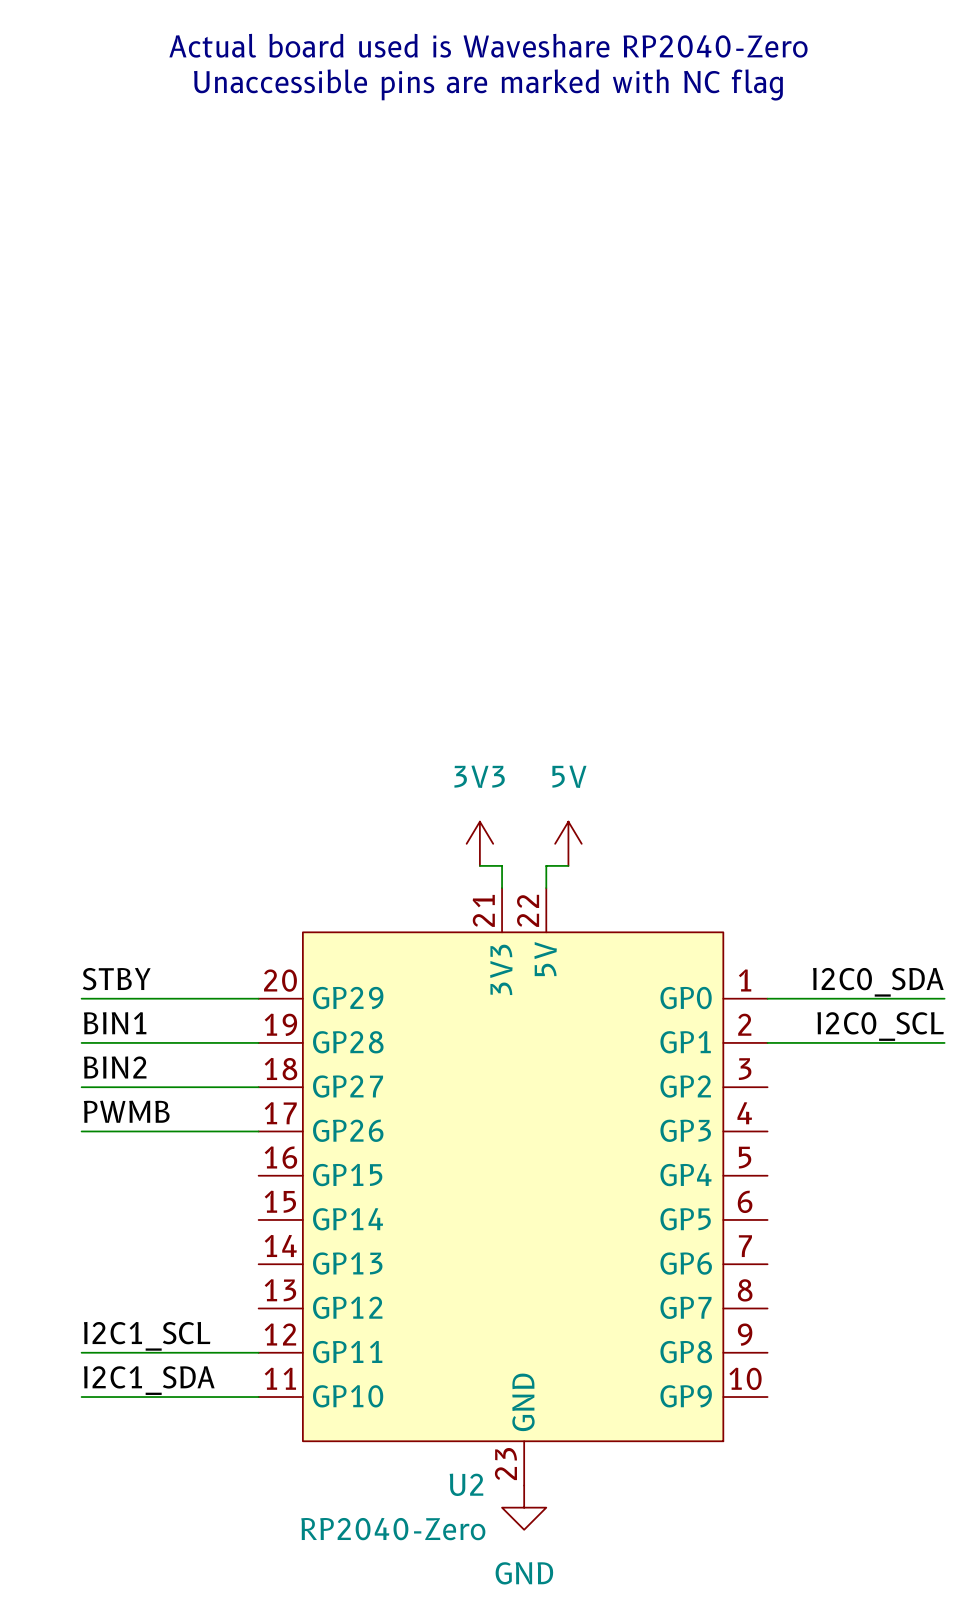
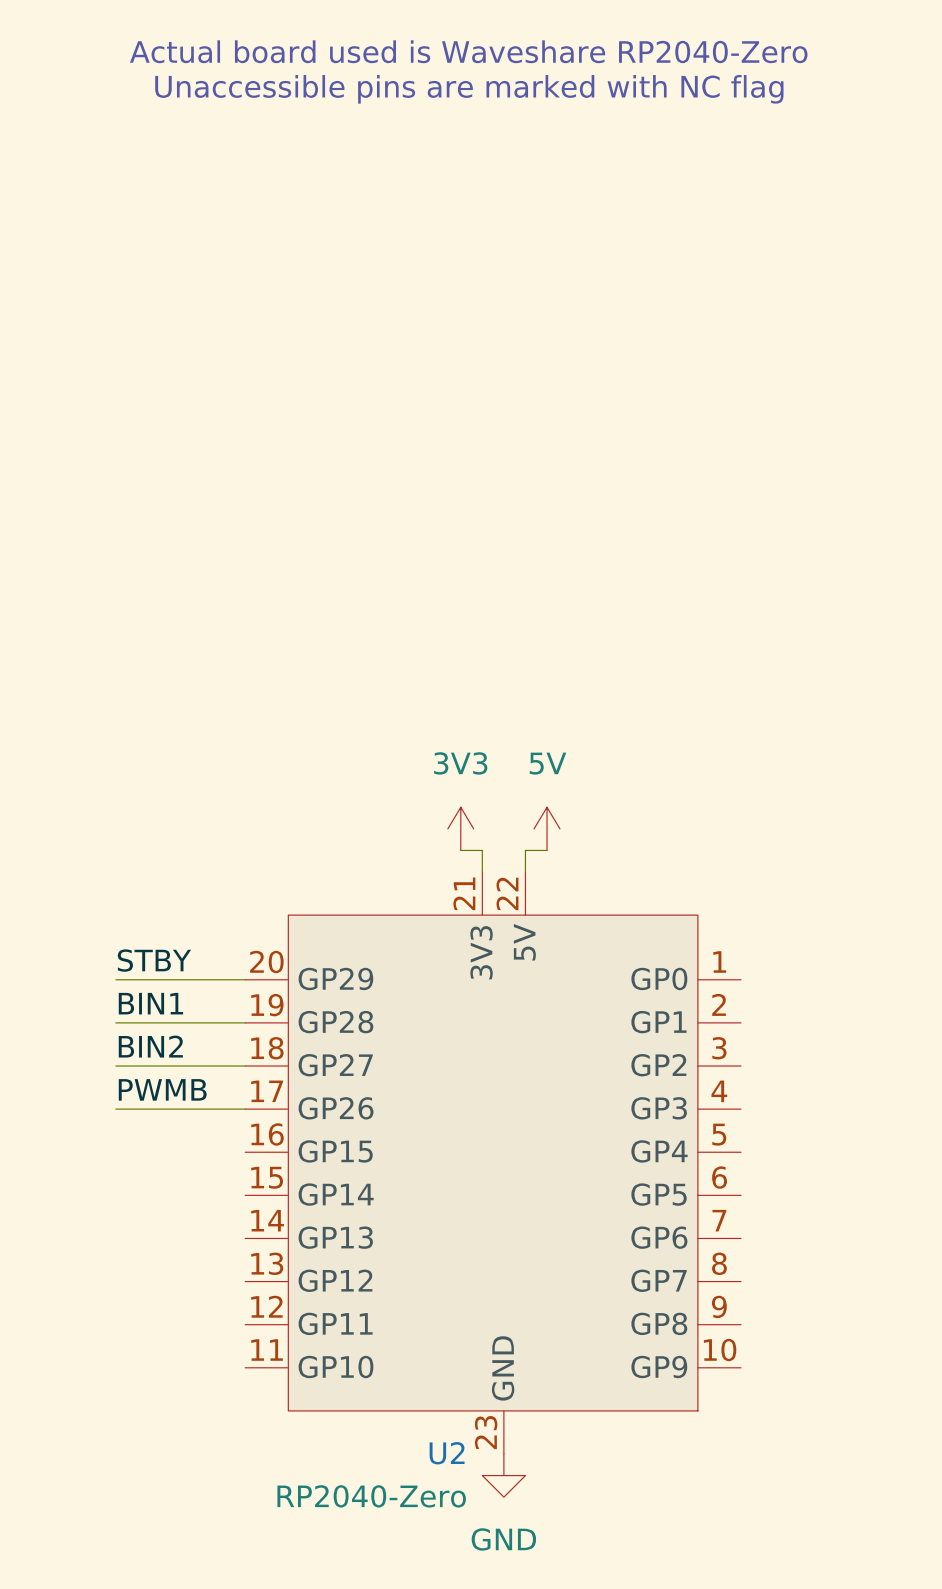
label position: STBY (116, 979) -> STBY (154, 960)
label: I2C0_SDA (878, 982) -> none
wire: (81, 998) (125, 998) -> none
wire: (767, 998) (944, 998) -> none
label position: BIN1 (115, 1023) -> BIN1 (150, 1003)
label: I2C0_SCL (880, 1026) -> none
wire: (81, 1042) (125, 1042) -> none
wire: (767, 1042) (944, 1042) -> none
label position: BIN2 (115, 1067) -> BIN2 (150, 1046)
wire: (81, 1087) (125, 1087) -> none
label position: PWMB (126, 1111) -> PWMB (162, 1089)
wire: (81, 1131) (125, 1131) -> none
label: I2C1_SCL (147, 1336) -> none
wire: (81, 1352) (258, 1352) -> none
label: I2C1_SDA (149, 1380) -> none
wire: (81, 1397) (258, 1397) -> none

